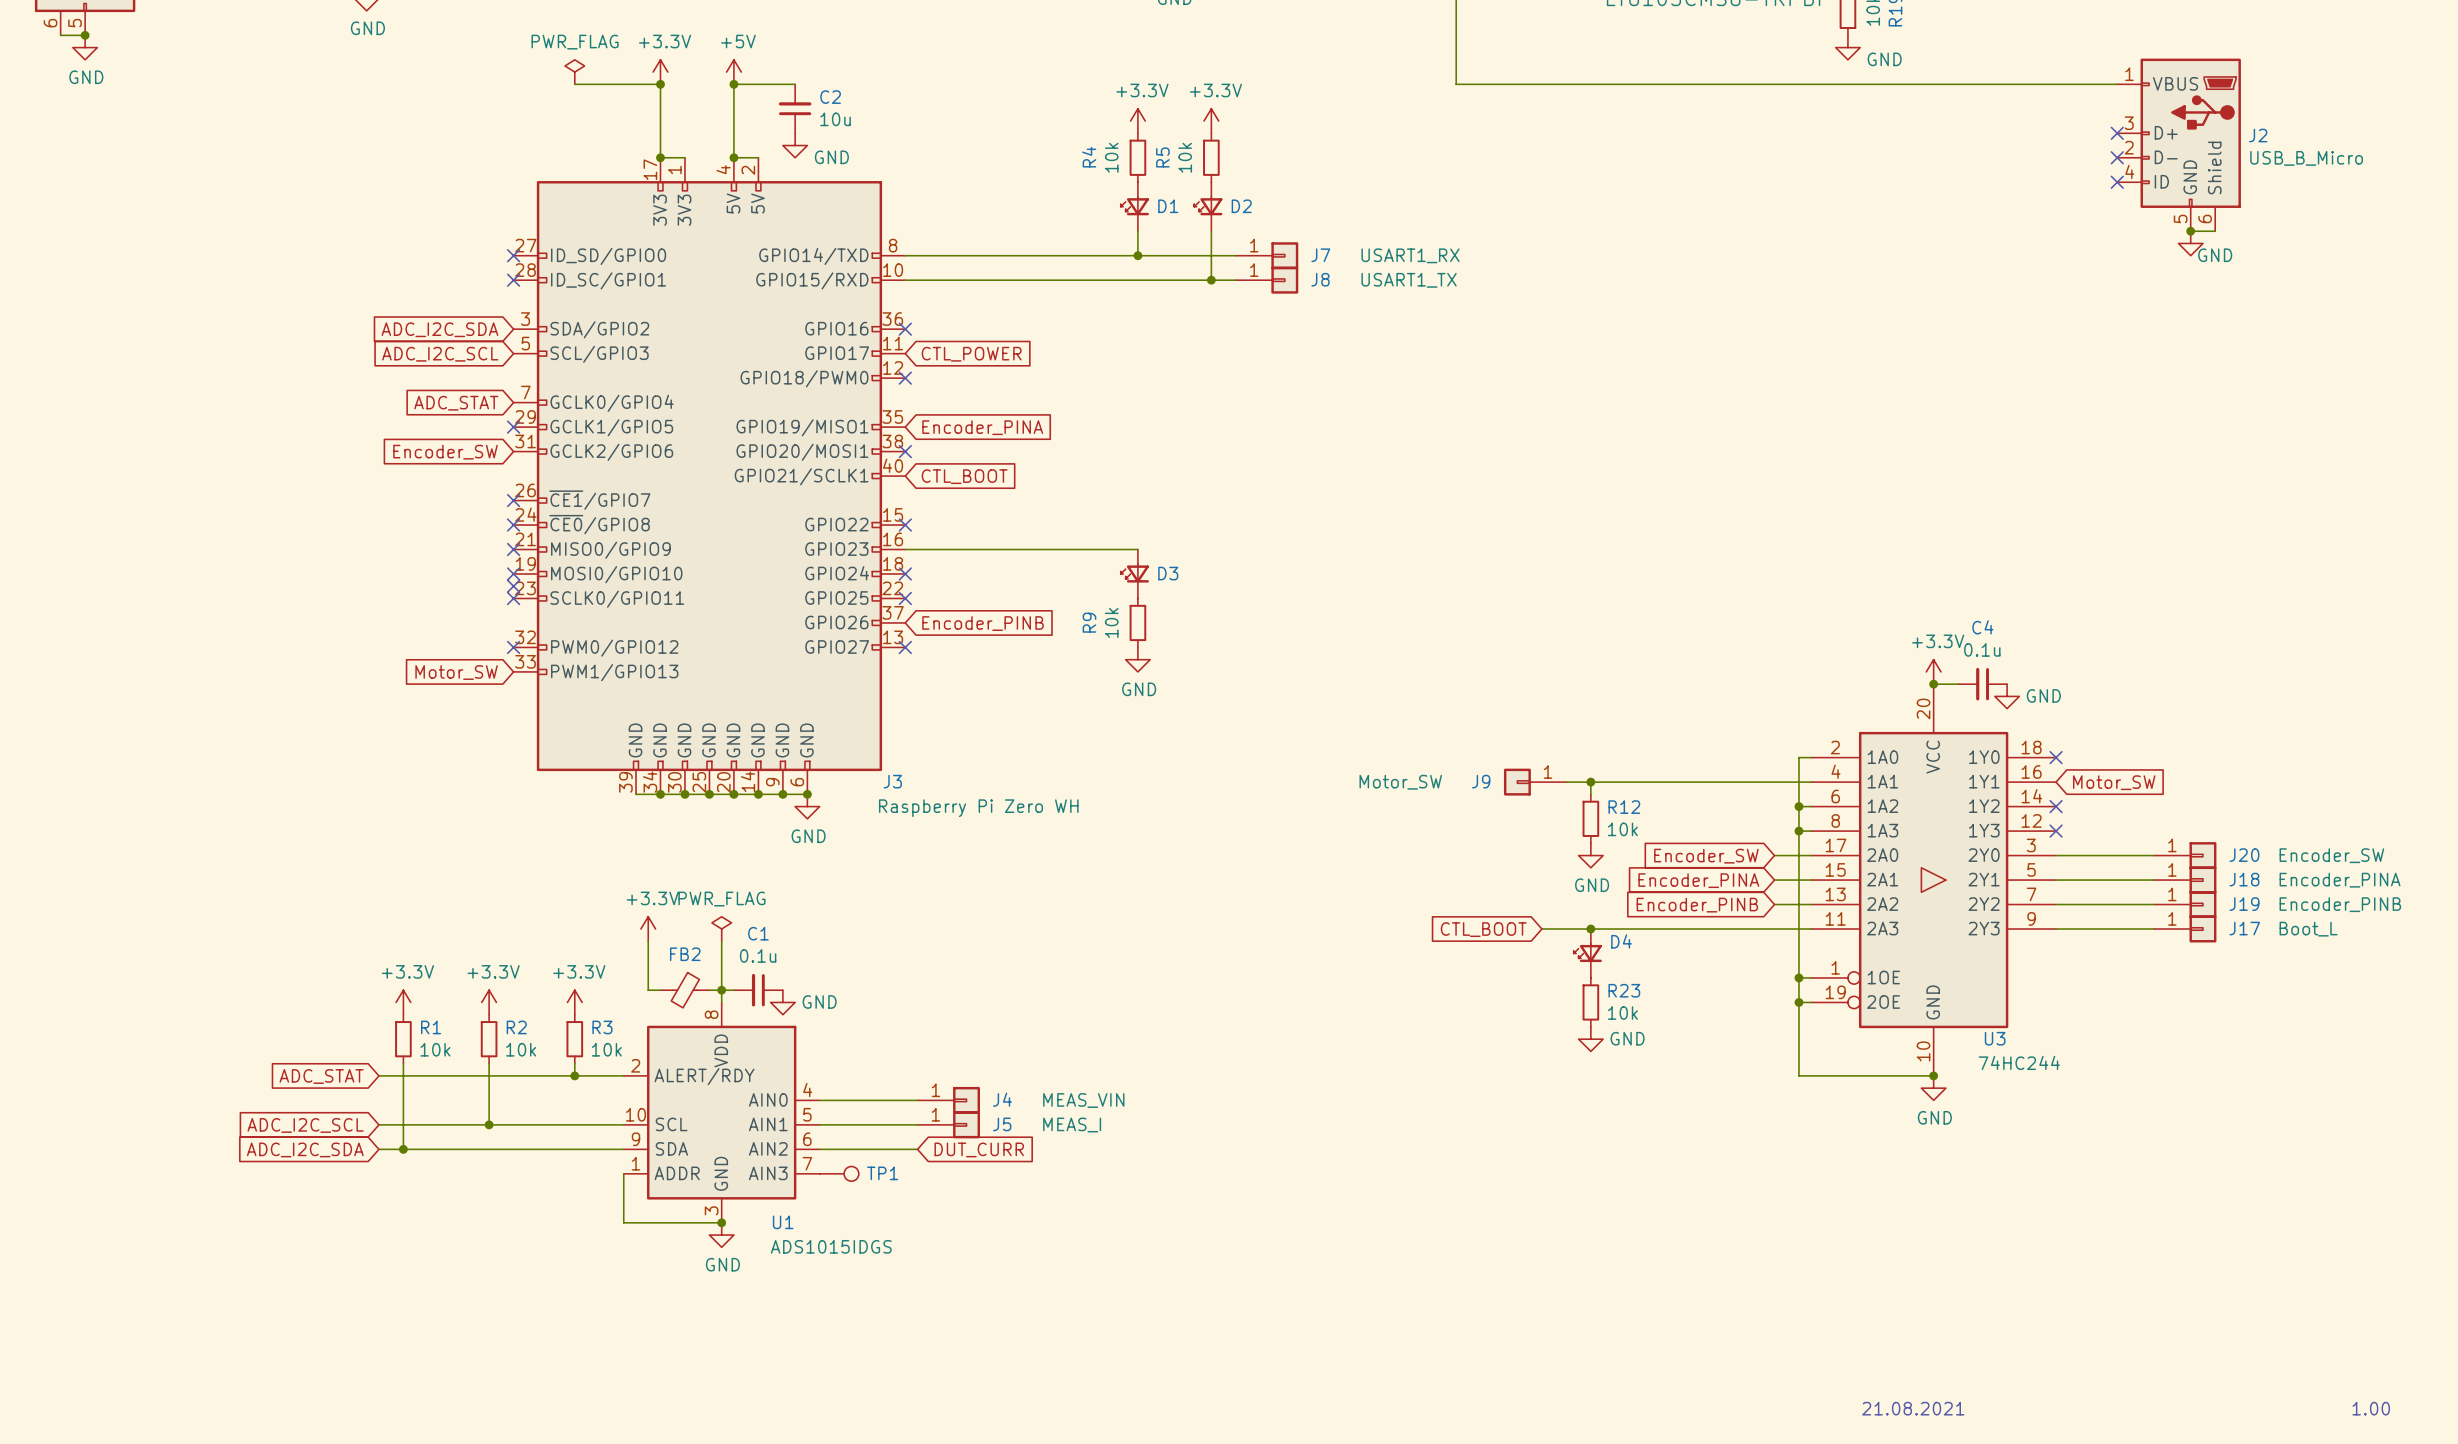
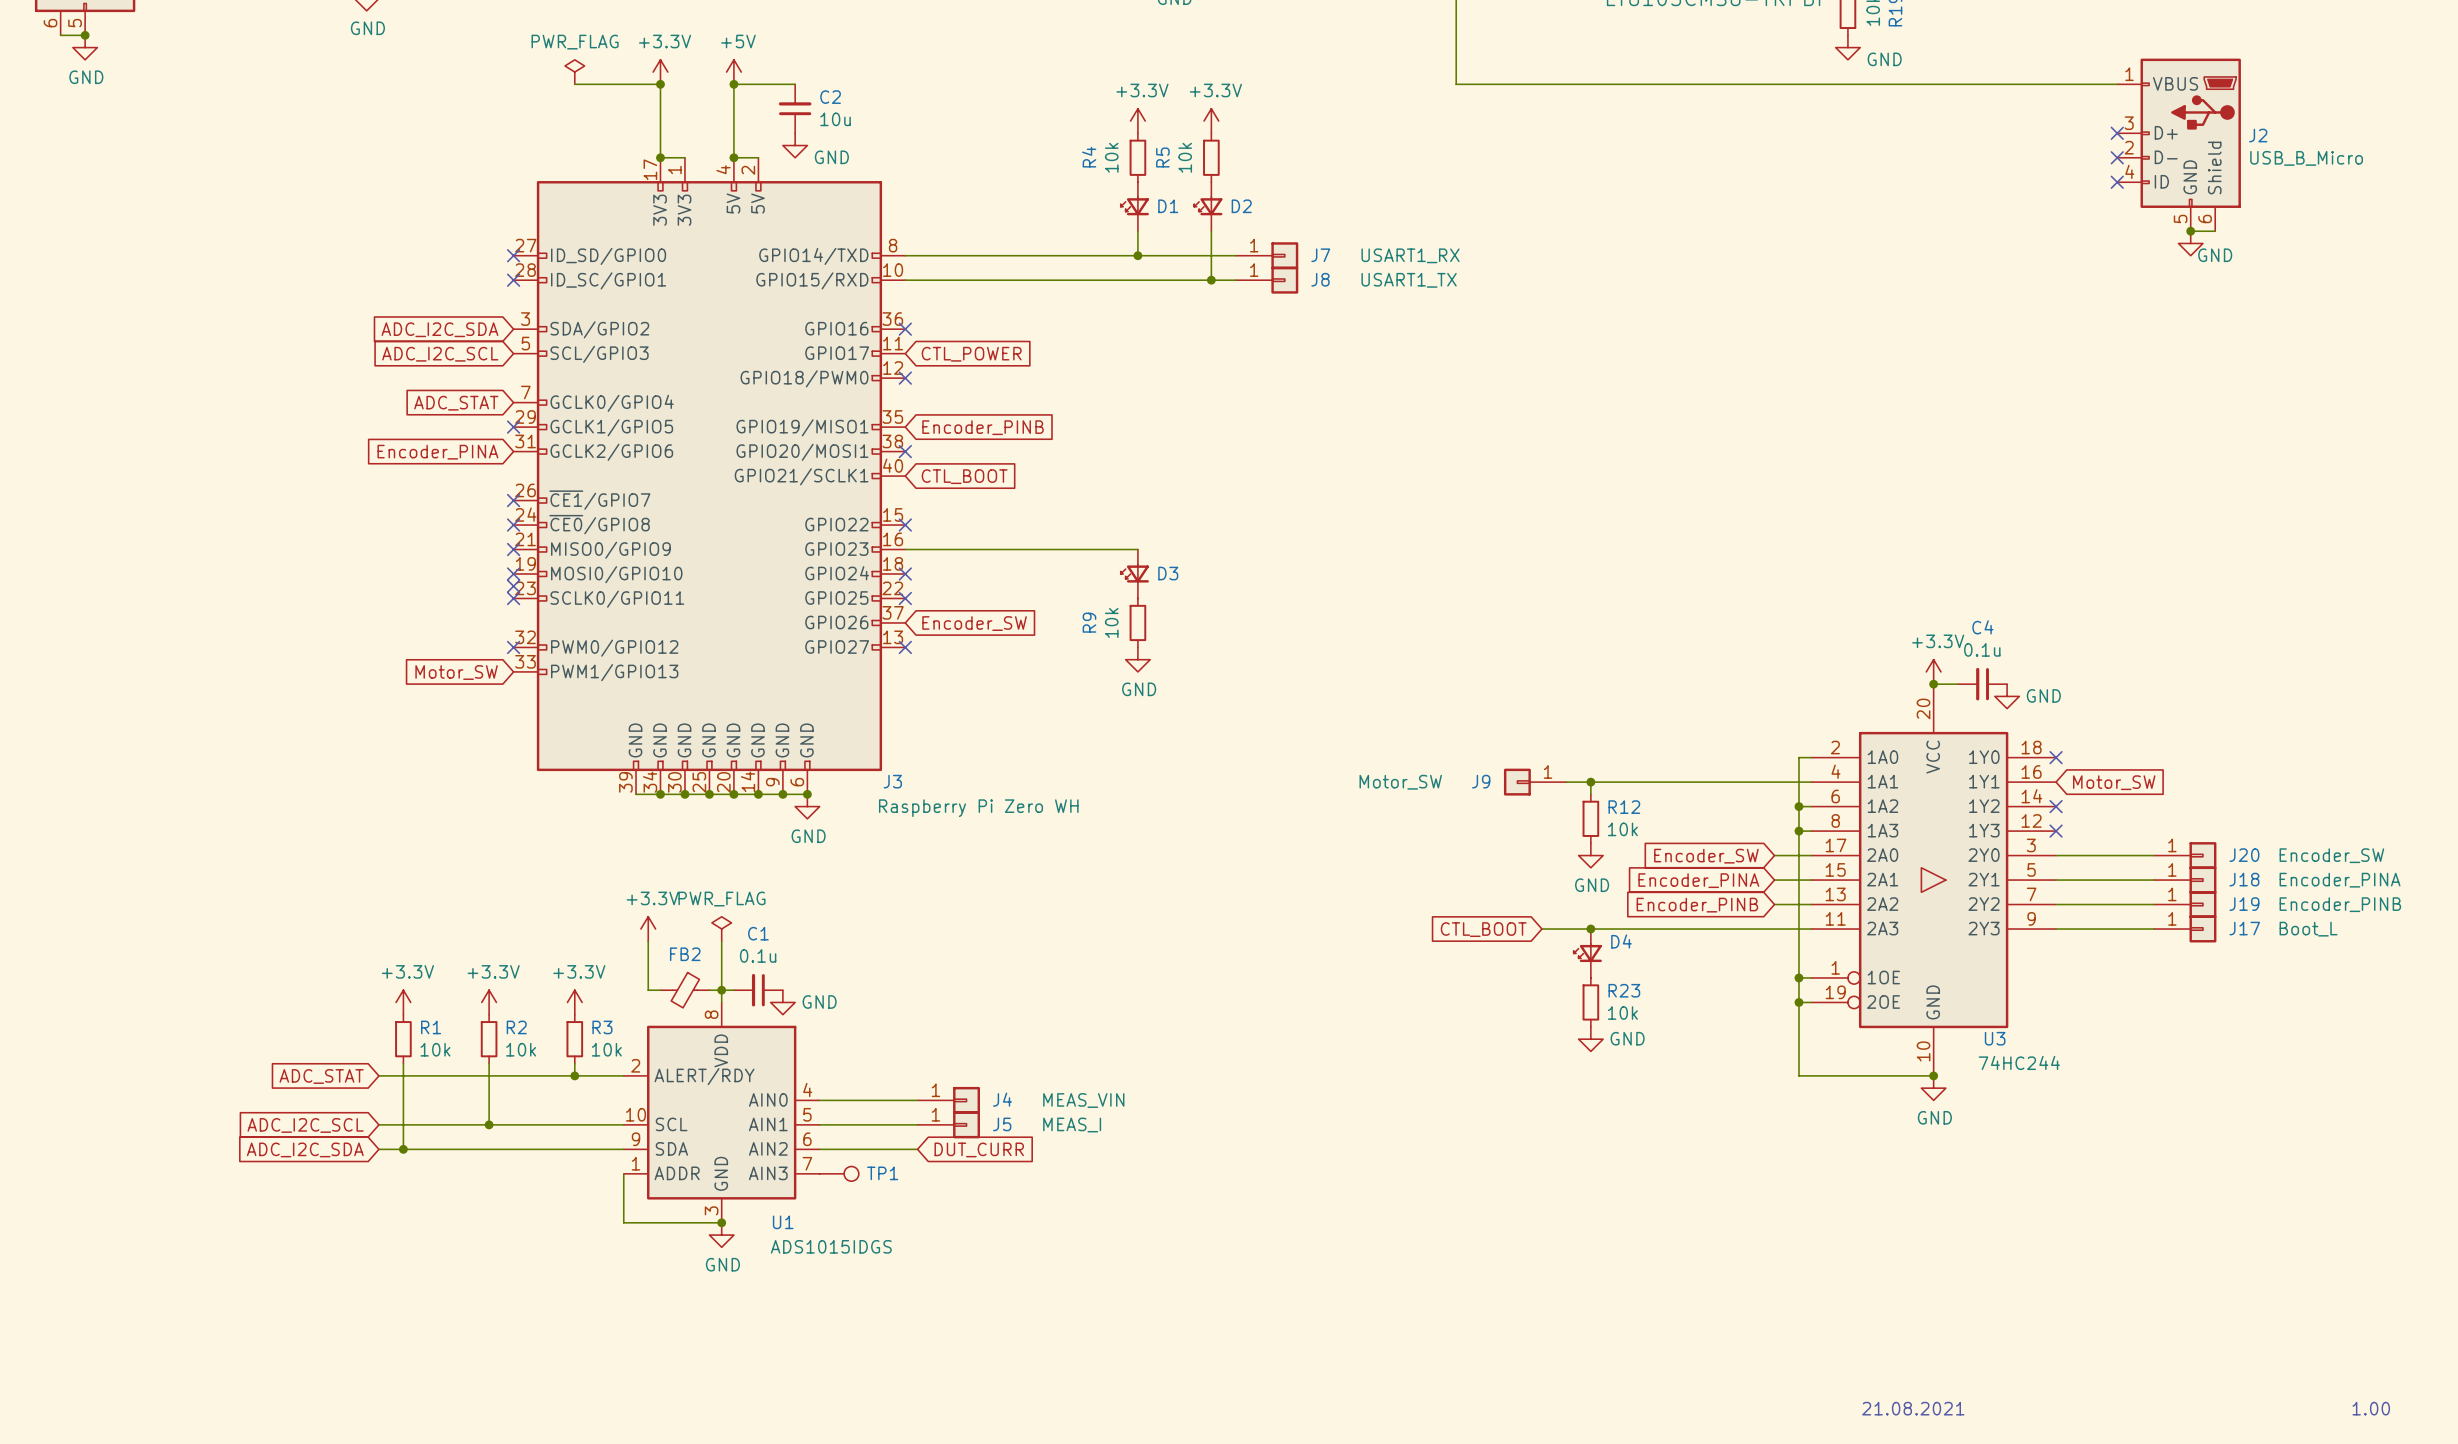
global label: Encoder_PINA (982, 427) -> Encoder_PINB (983, 427)
global label: Encoder_SW (445, 452) -> Encoder_PINA (437, 452)
global label: Encoder_PINB (983, 623) -> Encoder_SW (974, 623)

